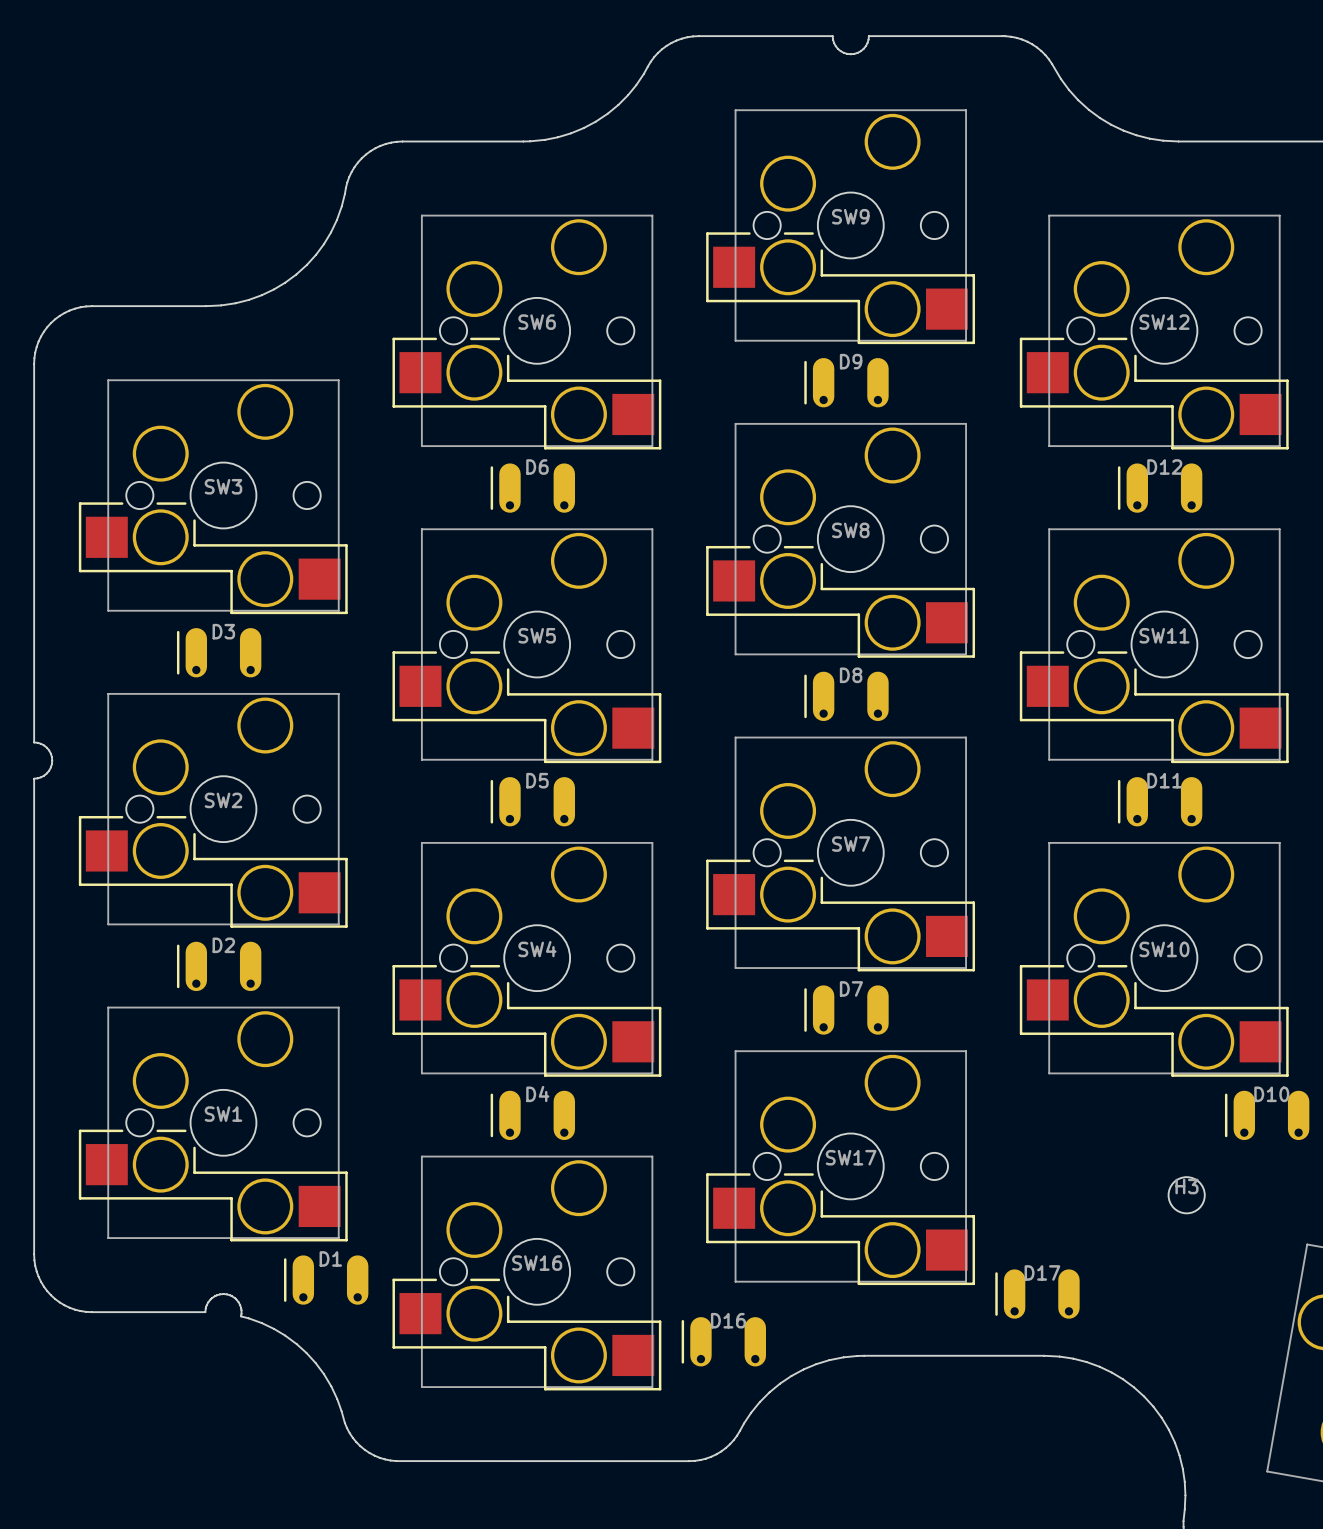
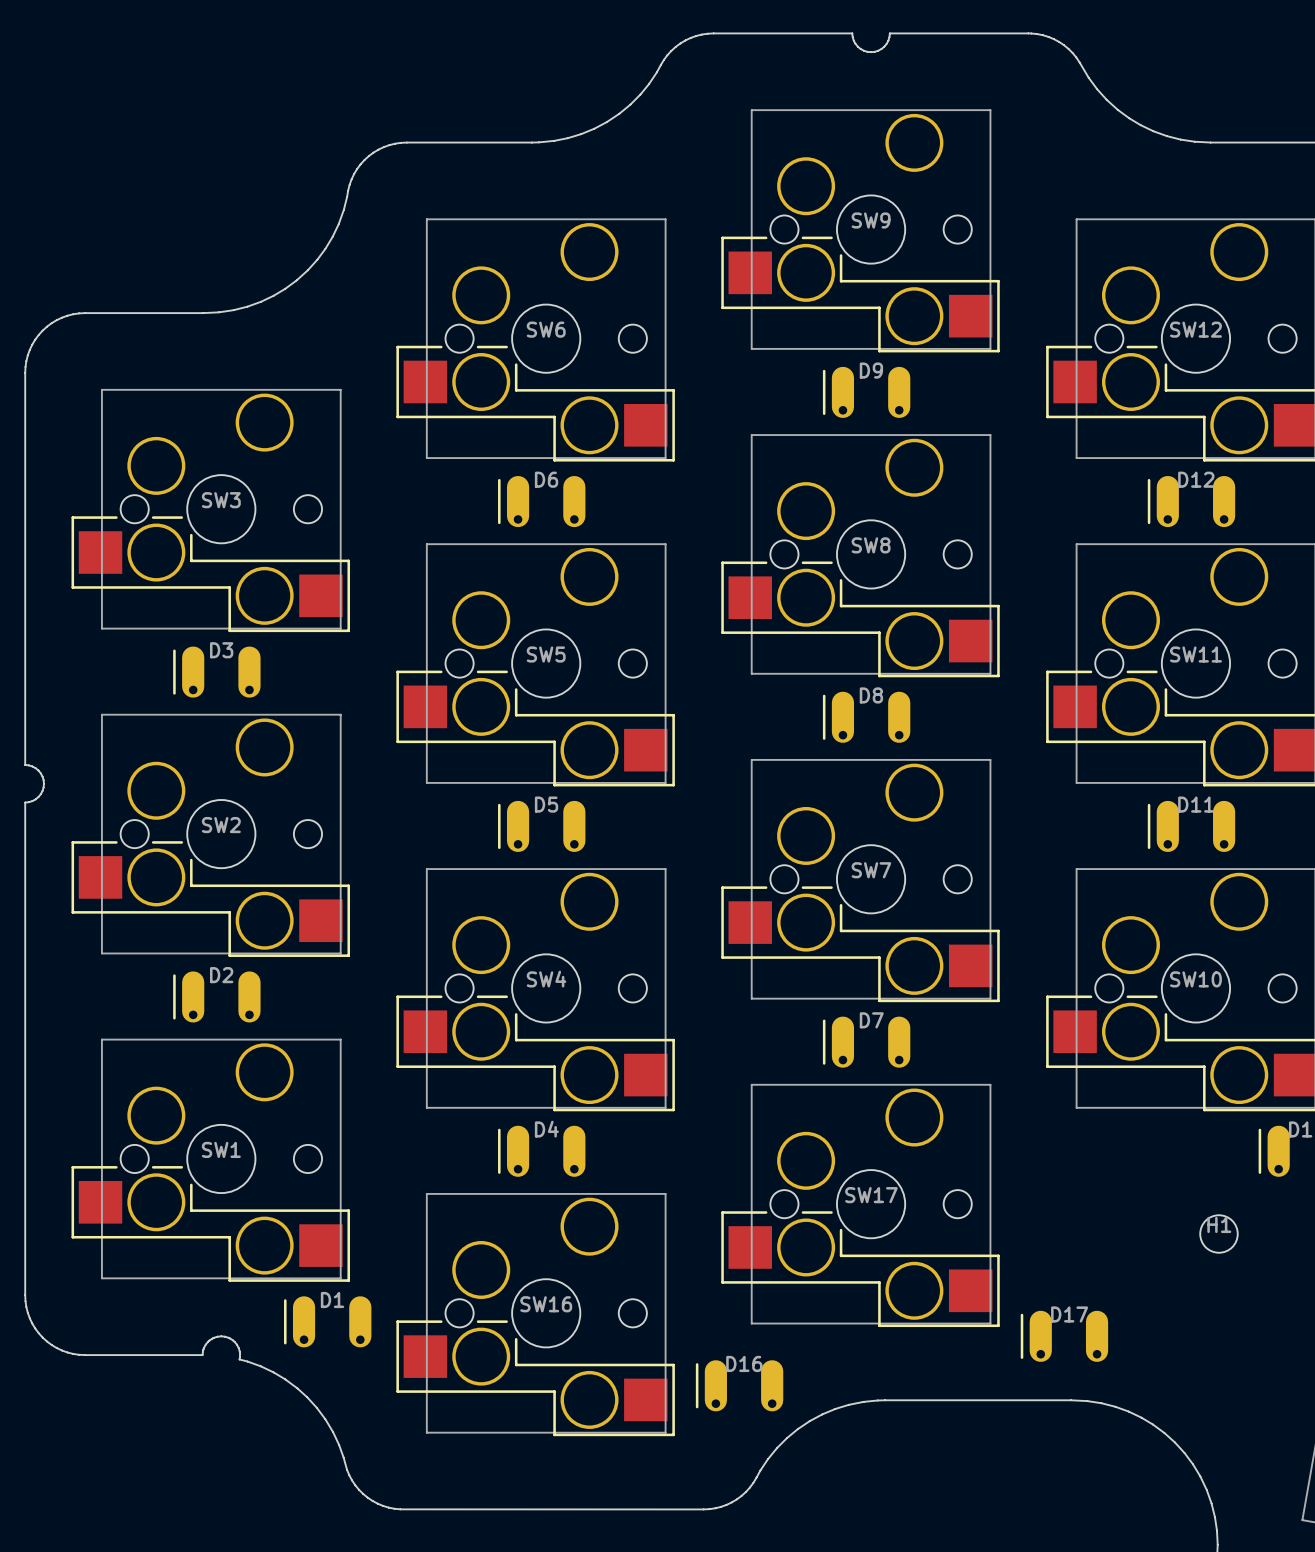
H3 name: H3 (1186, 1186) -> H1 (1219, 1224)

